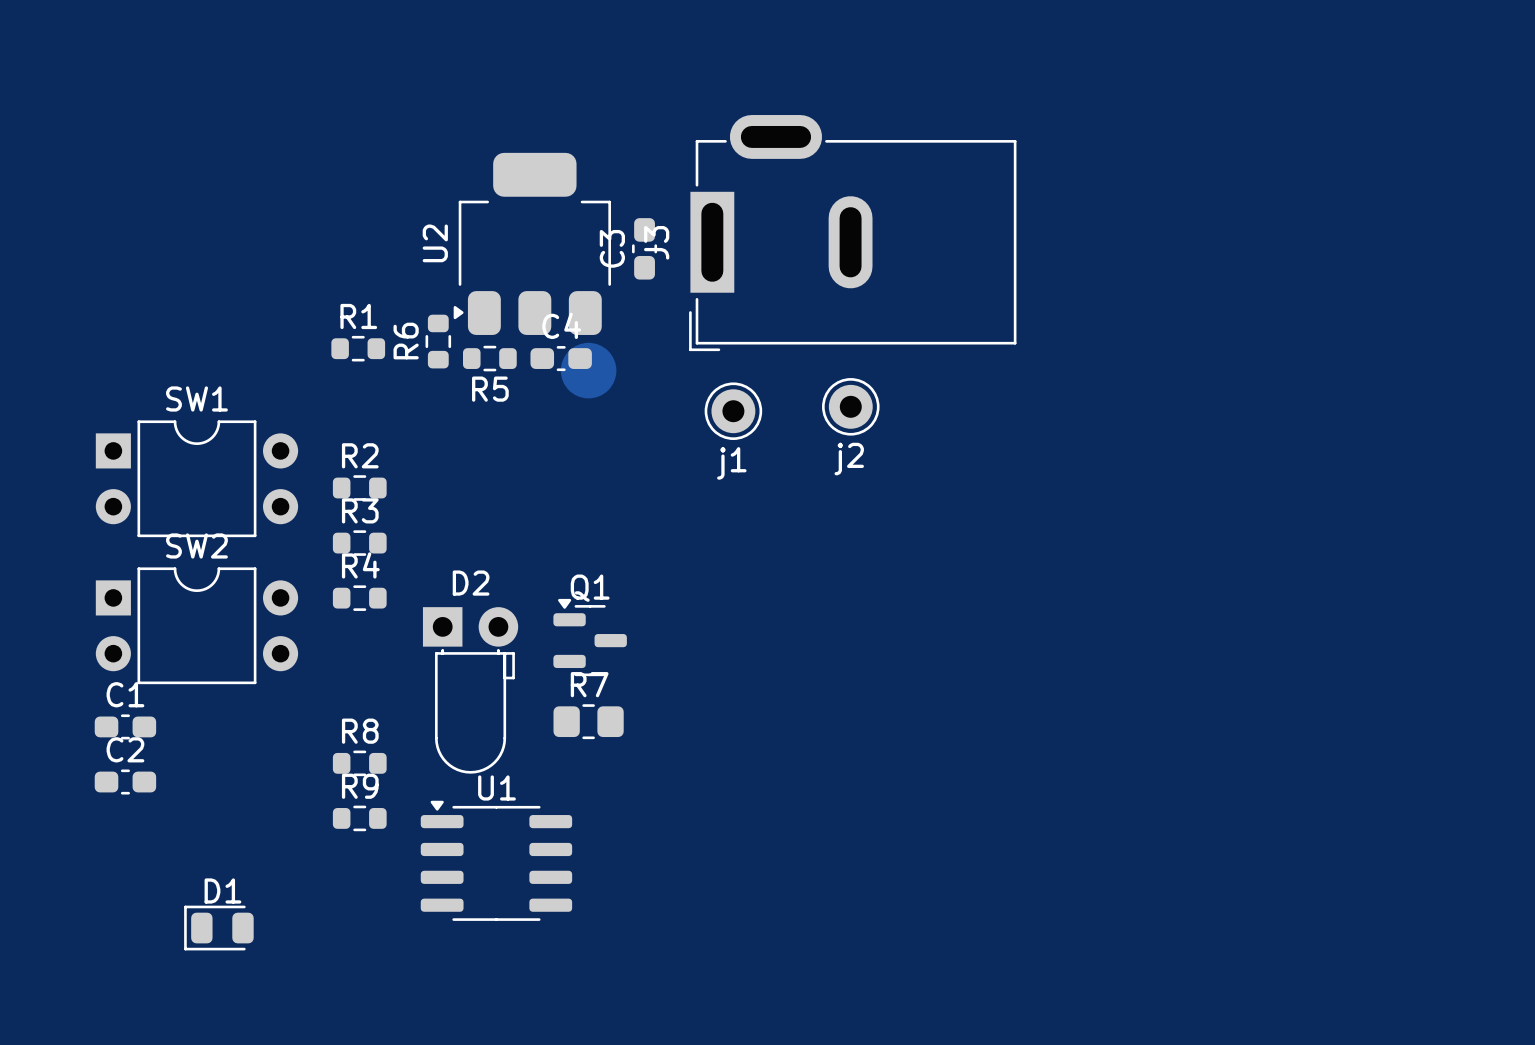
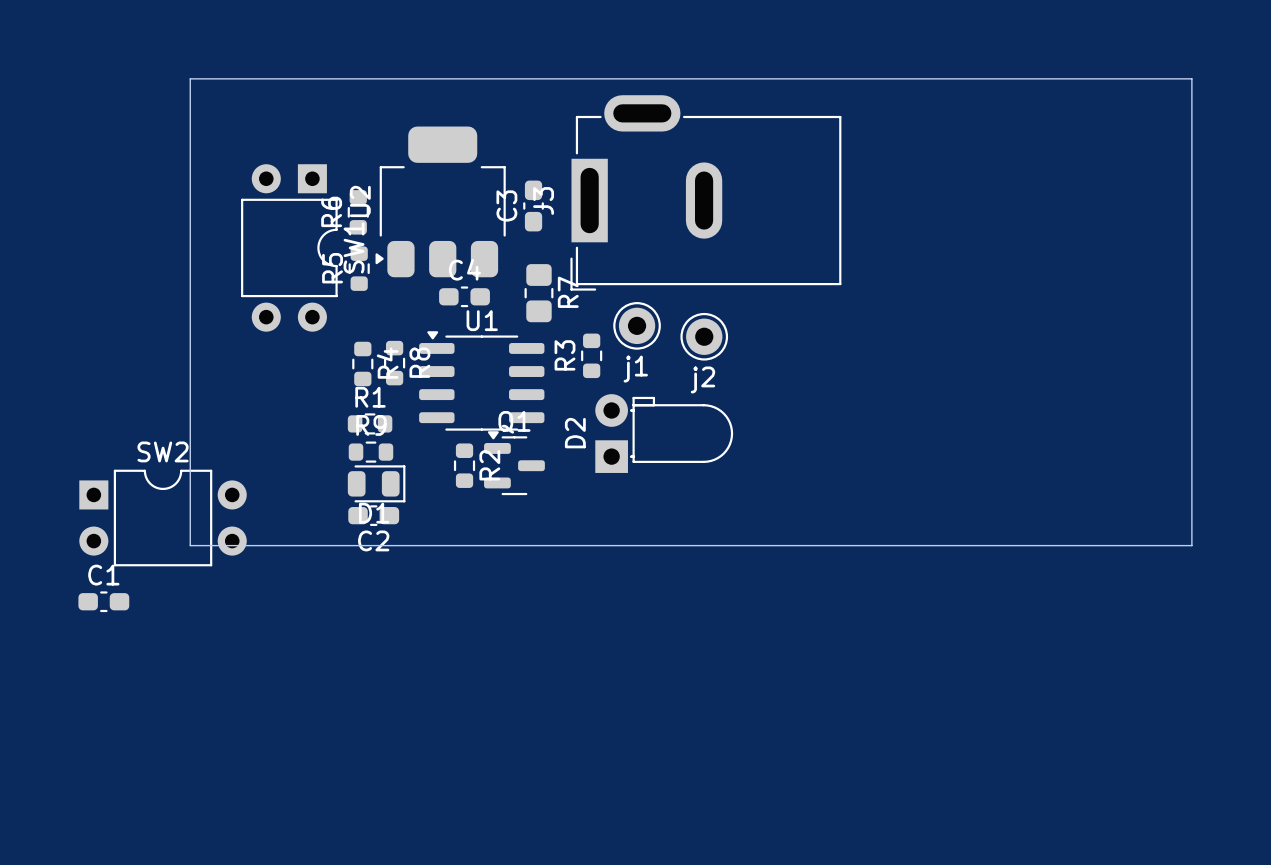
board edge: none -> (190, 78) (1191, 78) (1191, 545) (190, 545) (190, 78)
R6 position: (438, 341) -> (358, 212)
drawing: [560, 342, 617, 399] -> none
R1 position: (358, 348) -> (370, 423)
R5 rotation: 0° (489, 358) -> 90° clockwise (359, 268)
R5 position: (489, 358) -> (359, 268)
j1 position: (733, 411) -> (637, 325)
SW1 rotation: 0° (196, 478) -> 90° clockwise (289, 247)
SW1 position: (196, 478) -> (289, 247)
R2 rotation: 0° (359, 488) -> 90° clockwise (464, 465)
R2 position: (359, 488) -> (464, 465)
R3 name position: R3 (360, 510) -> R3 (565, 355)
R3 rotation: 0° (359, 543) -> 90° clockwise (591, 355)
R3 position: (359, 543) -> (591, 355)
R4 rotation: 0° (359, 598) -> 90° clockwise (362, 363)
R4 position: (359, 598) -> (362, 363)
Q1 position: (590, 637) -> (514, 463)
D2 rotation: 0° (470, 690) -> 90° counterclockwise (664, 433)
D2 position: (470, 690) -> (664, 433)
R7 rotation: 0° (588, 721) -> 90° clockwise (538, 293)
R7 position: (588, 721) -> (538, 293)
C2 name position: C2 (125, 749) -> C2 (373, 540)
R8 rotation: 0° (359, 763) -> 90° clockwise (394, 363)
R8 position: (359, 763) -> (394, 363)
C2 position: (125, 782) -> (373, 515)
R9 position: (359, 818) -> (370, 452)
U1 position: (496, 860) -> (481, 380)
D1 rotation: 0° (218, 928) -> 180° (376, 483)
D1 position: (218, 928) -> (376, 483)

